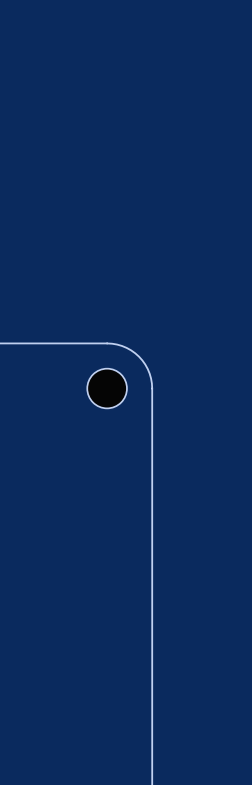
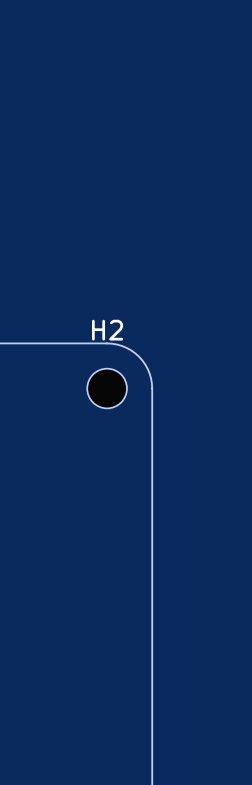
H2 name: none -> H2 (107, 330)

